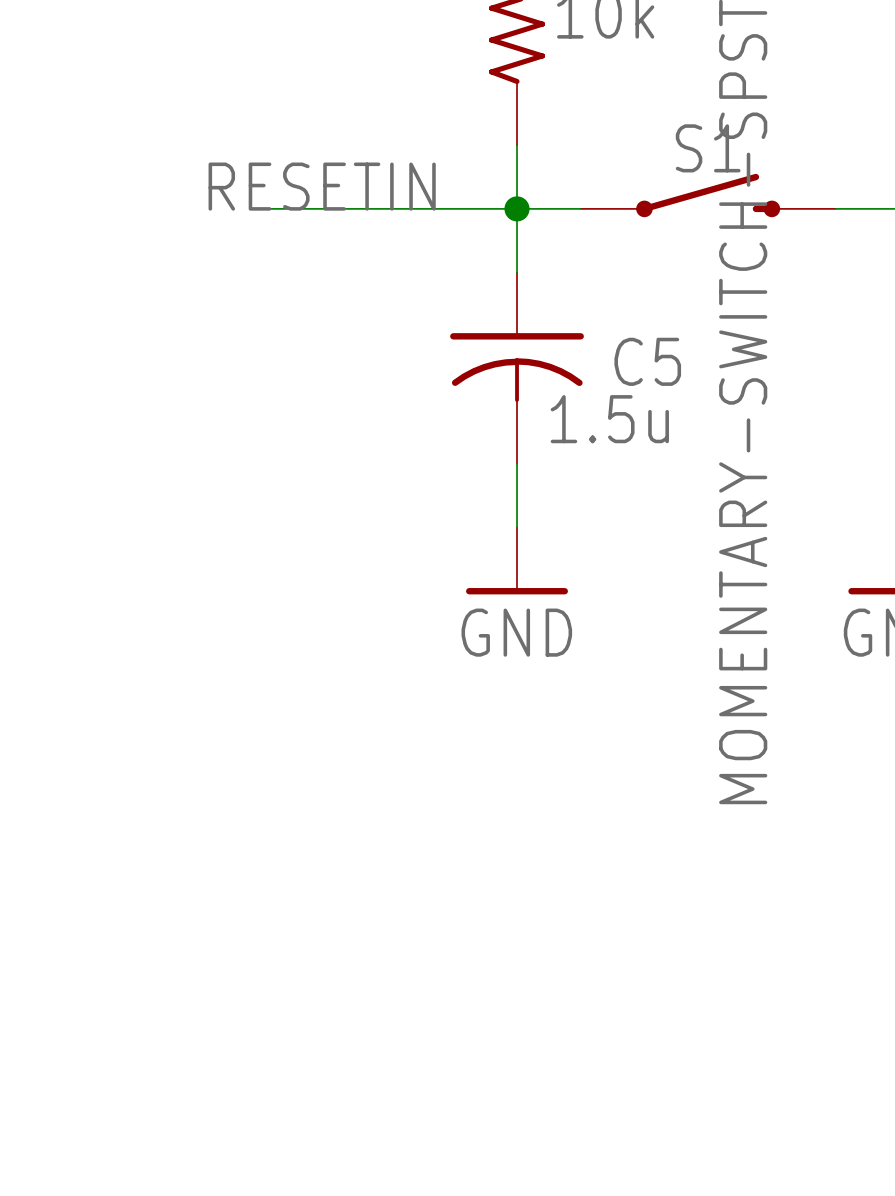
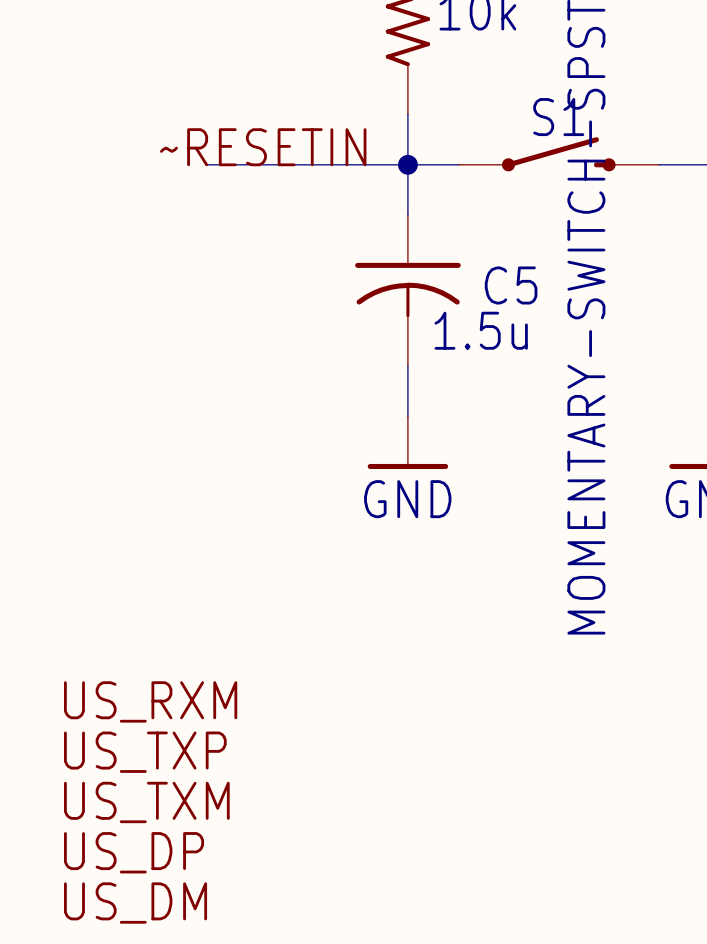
label: RESETIN (322, 186) -> ~RESETIN (263, 147)
label: none -> US_RXM (150, 701)
label: none -> US_TXP (145, 752)
label: none -> US_TXM (146, 802)
label: none -> US_DP (134, 852)
label: none -> US_DM (135, 903)

